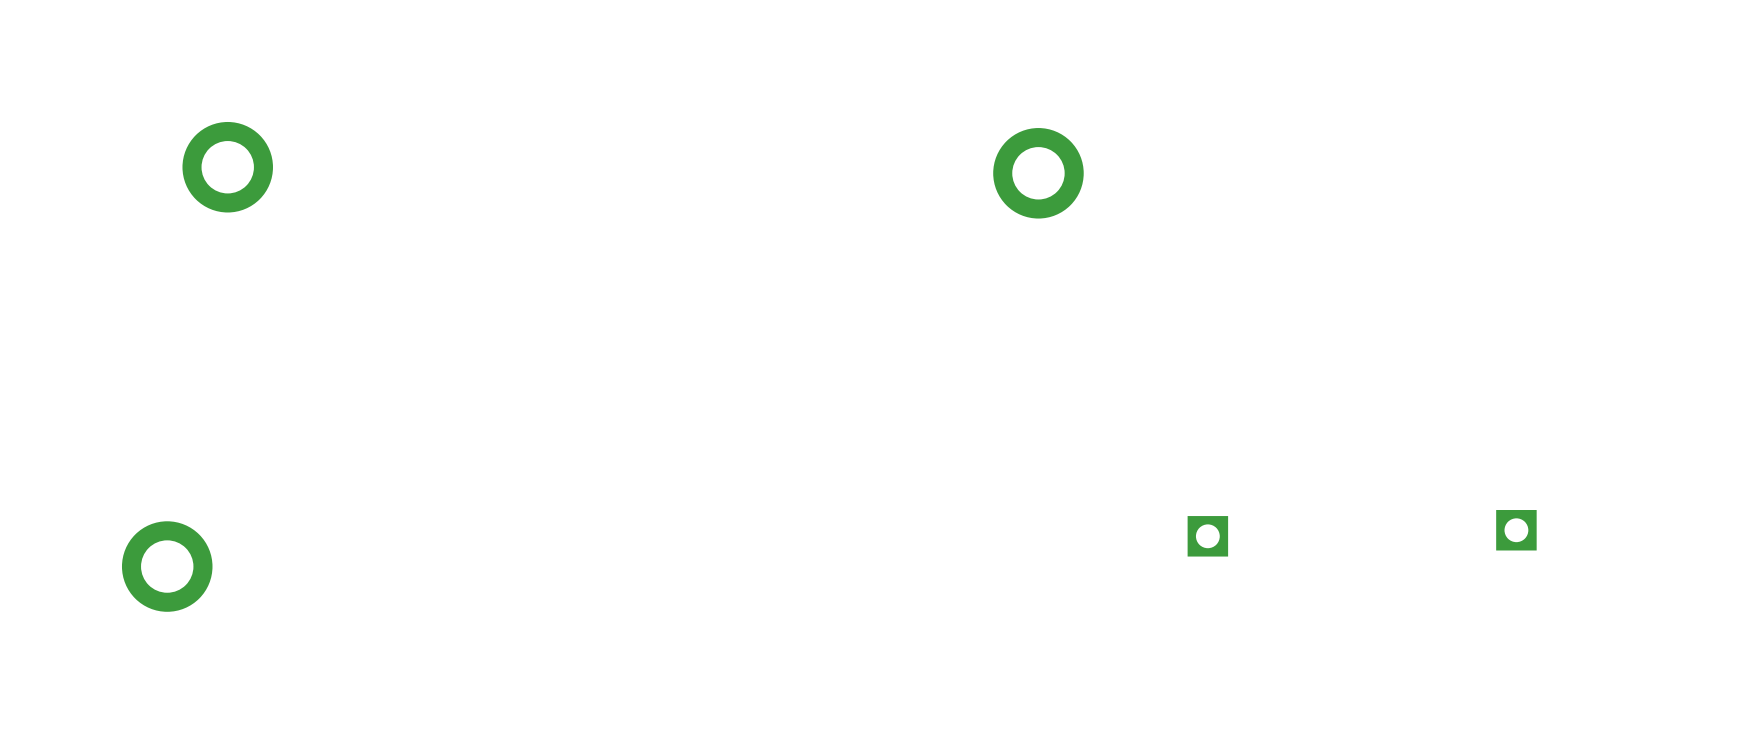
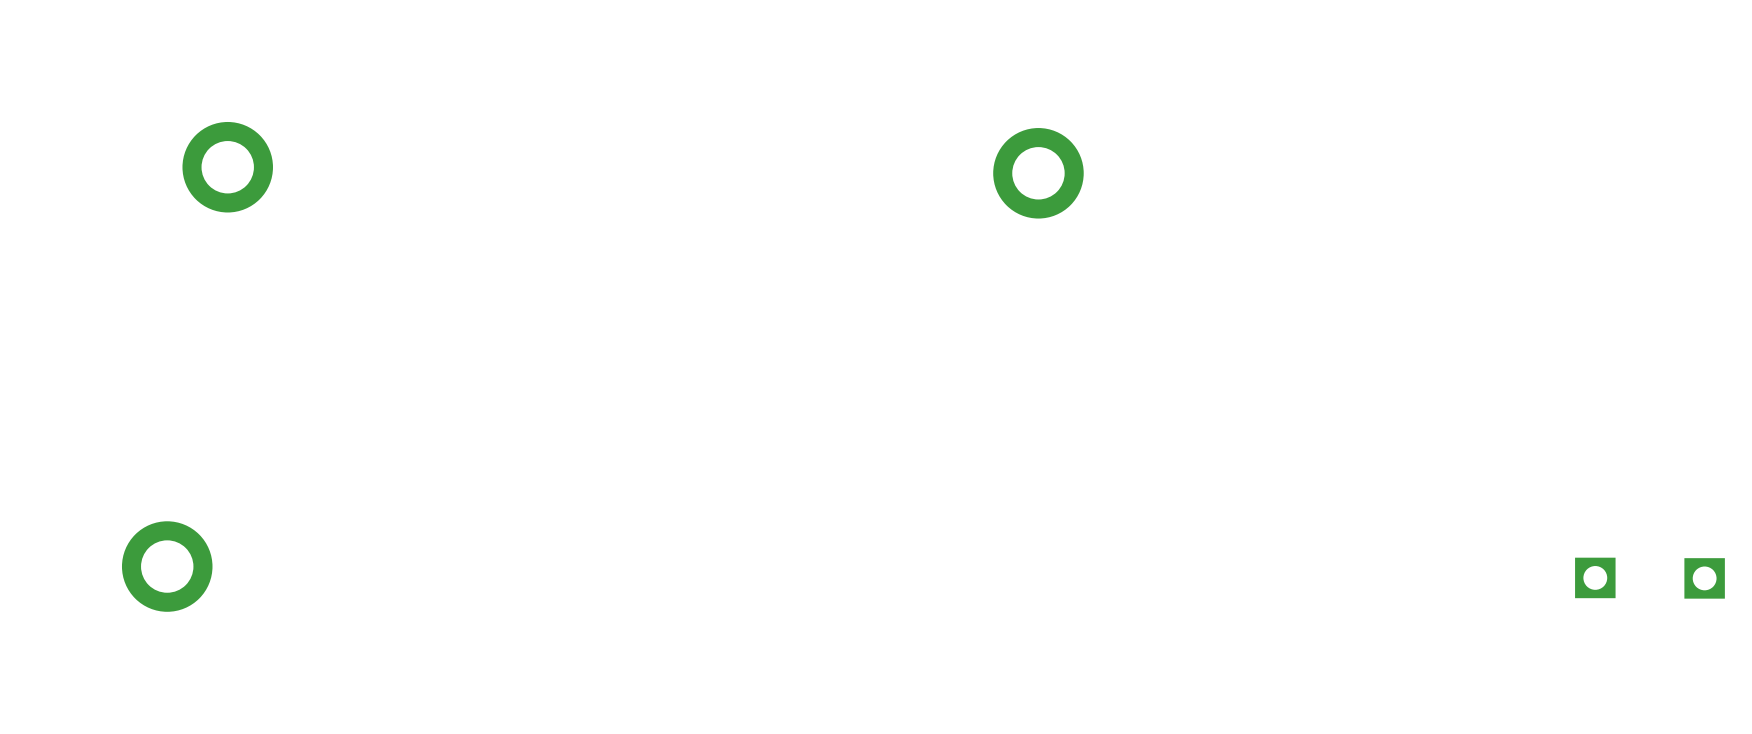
part position: (1516, 530) -> (1595, 577)
part: (1207, 536) -> none
part: none -> (1704, 578)

